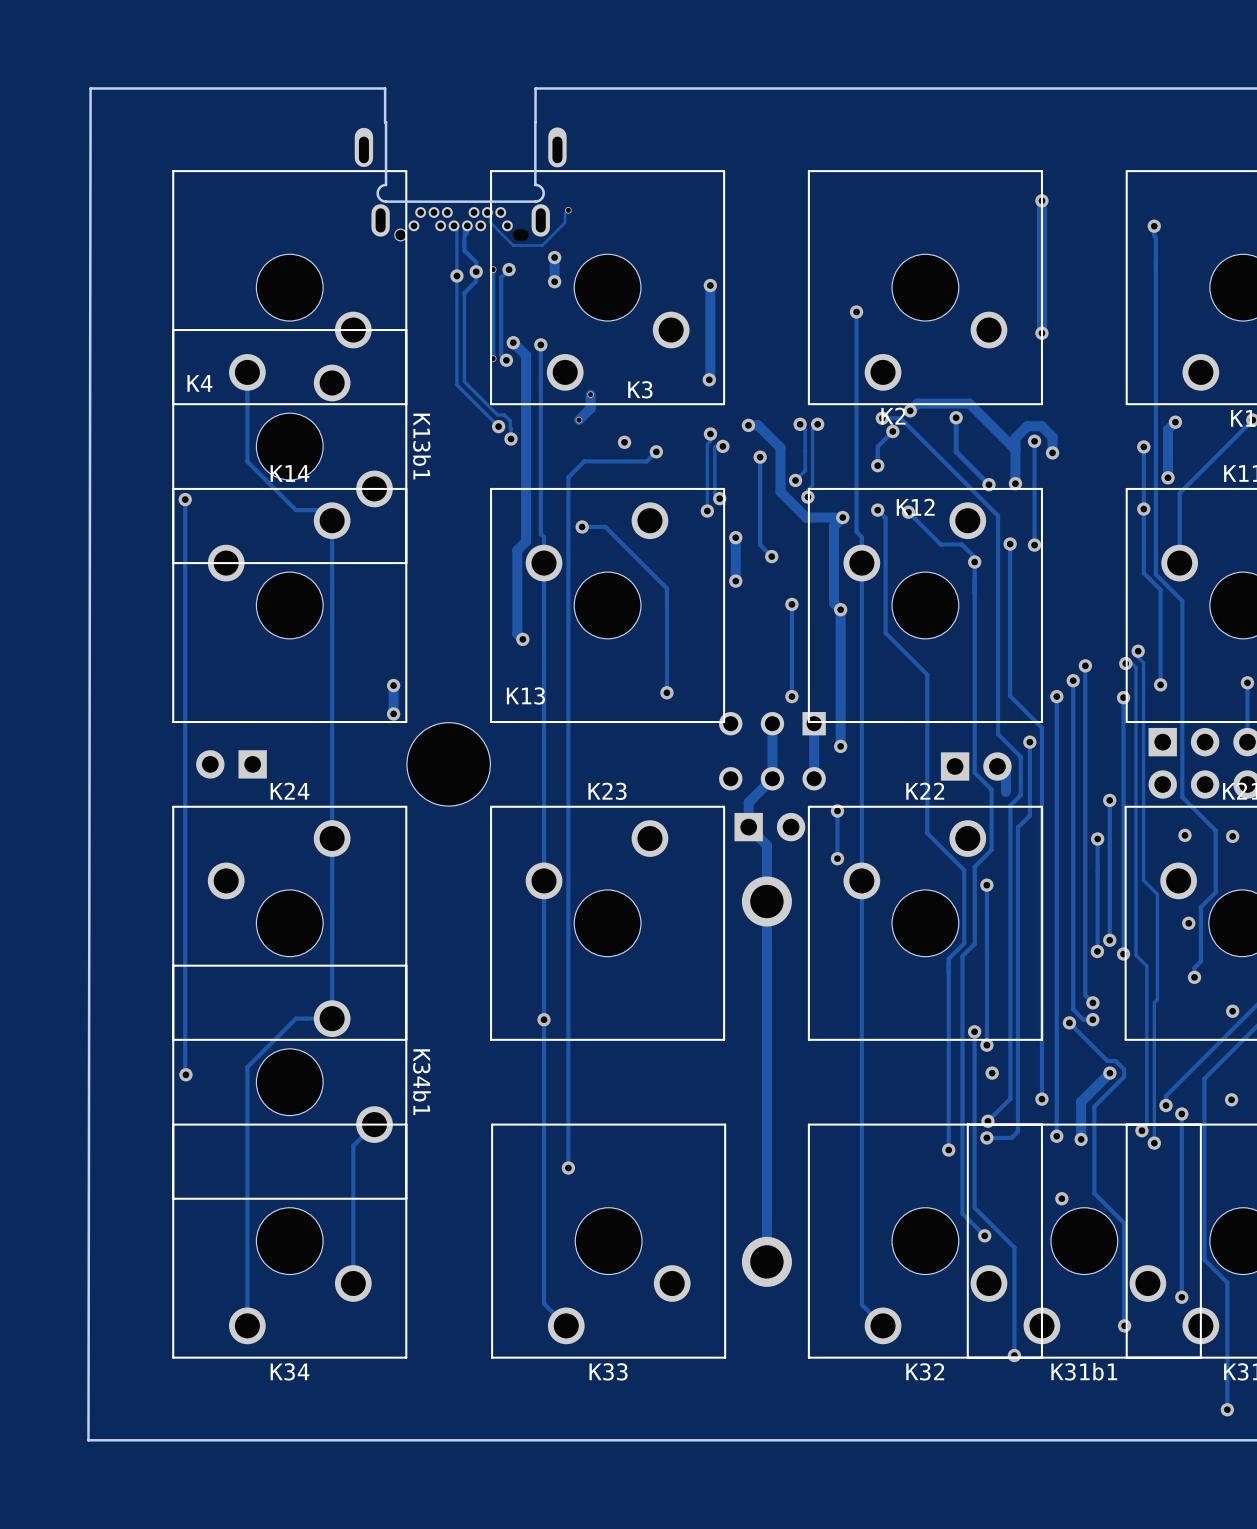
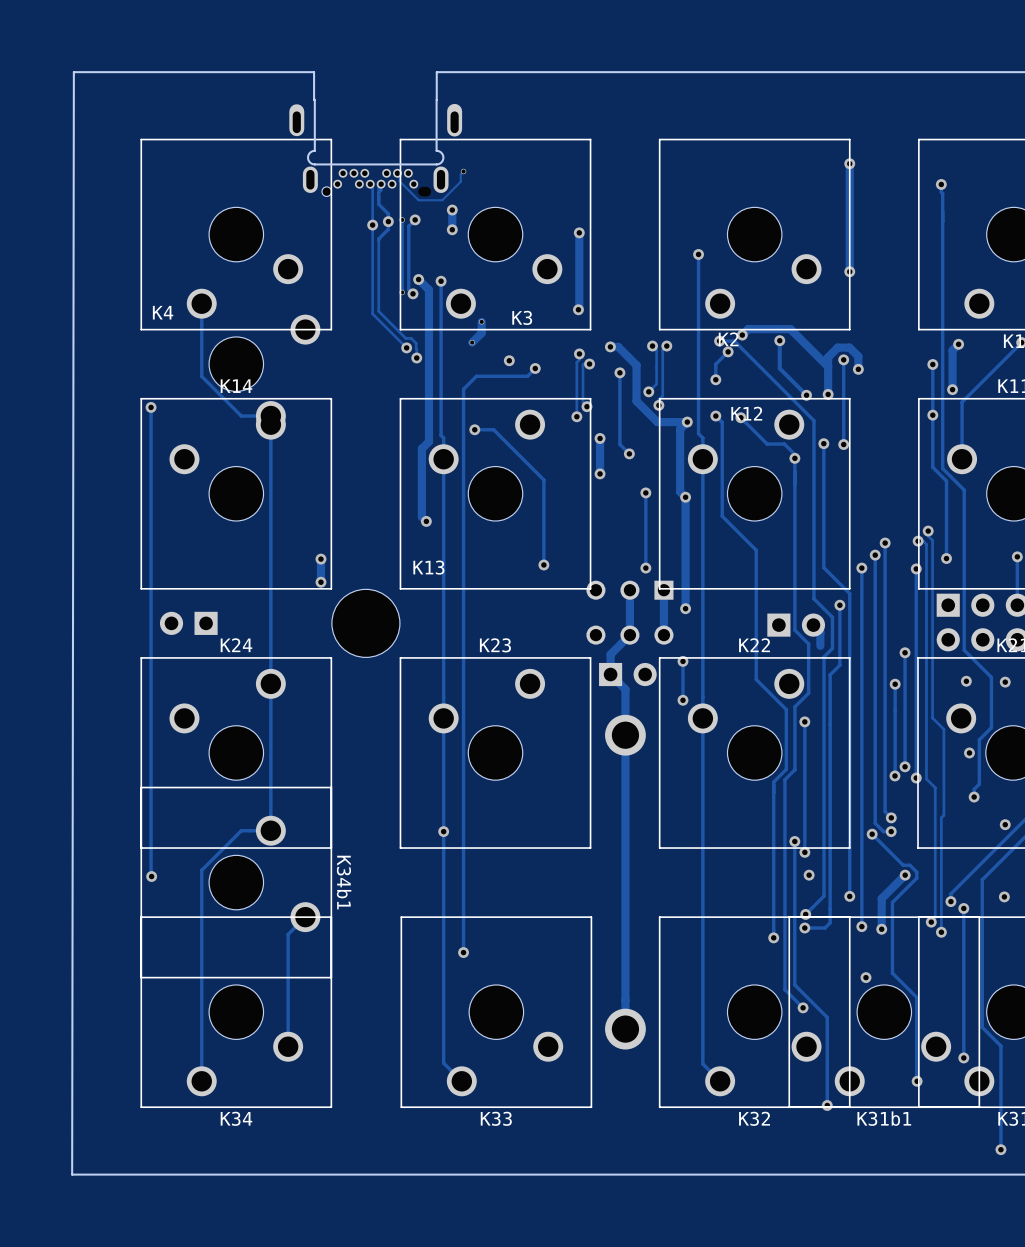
K13b1 side: bottom (289, 446) -> top (264, 372)

